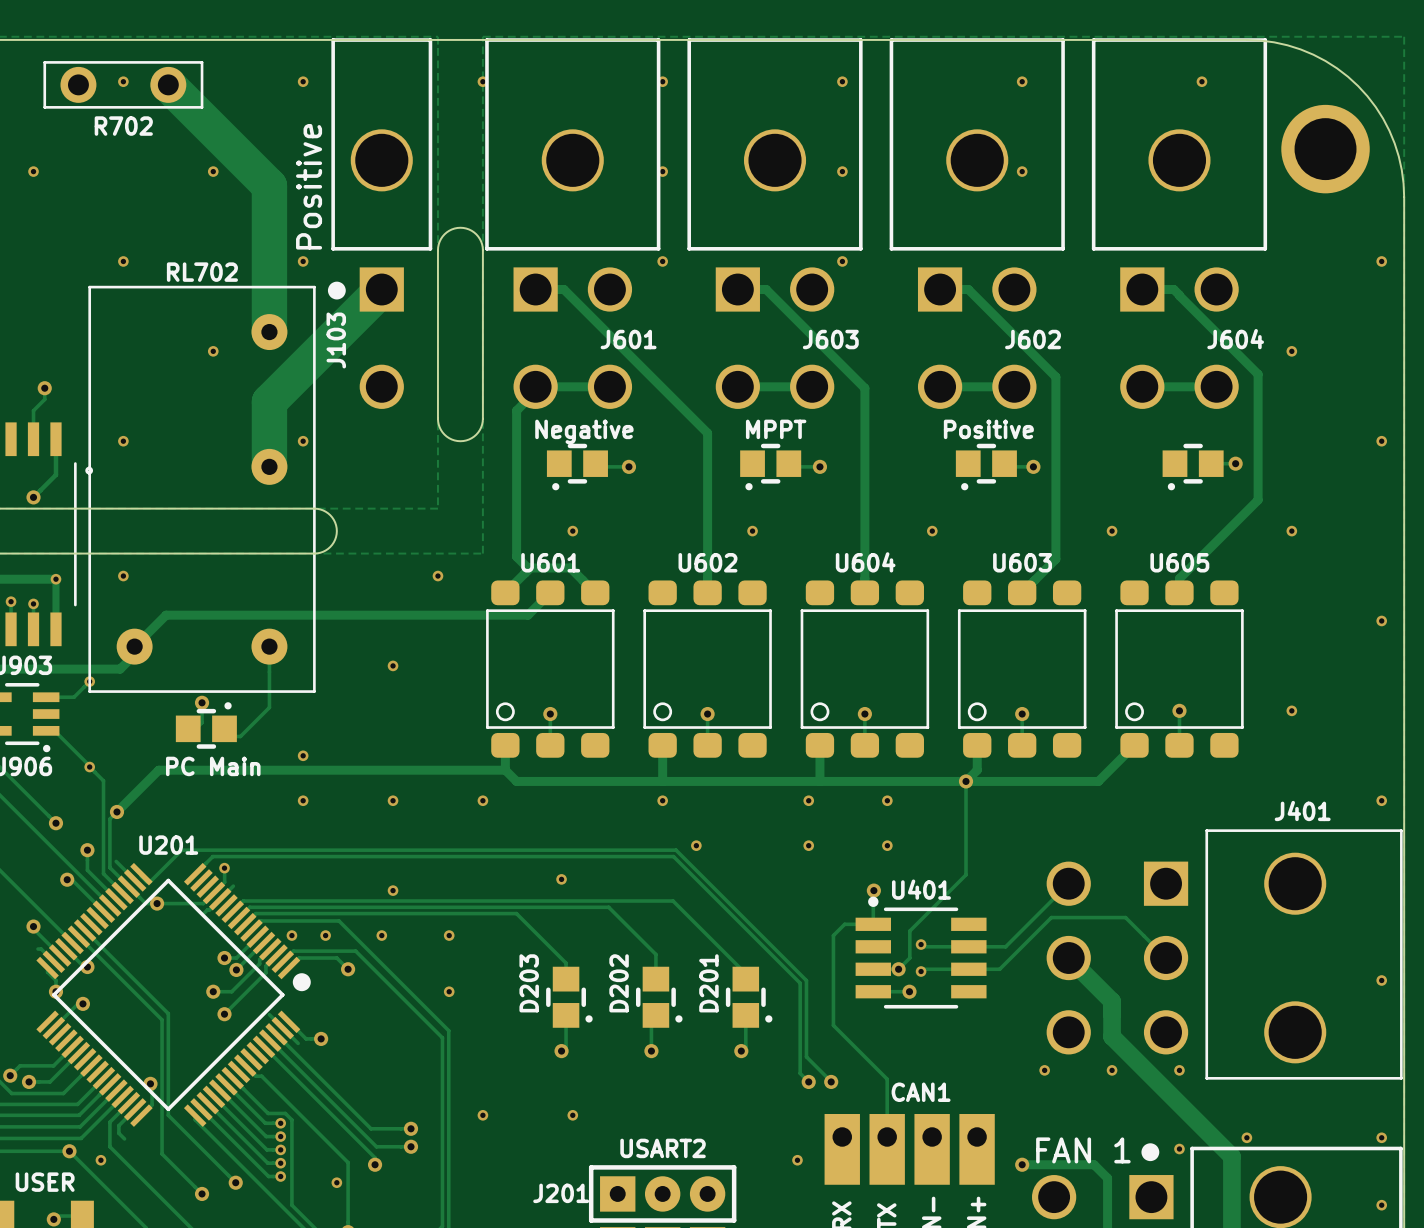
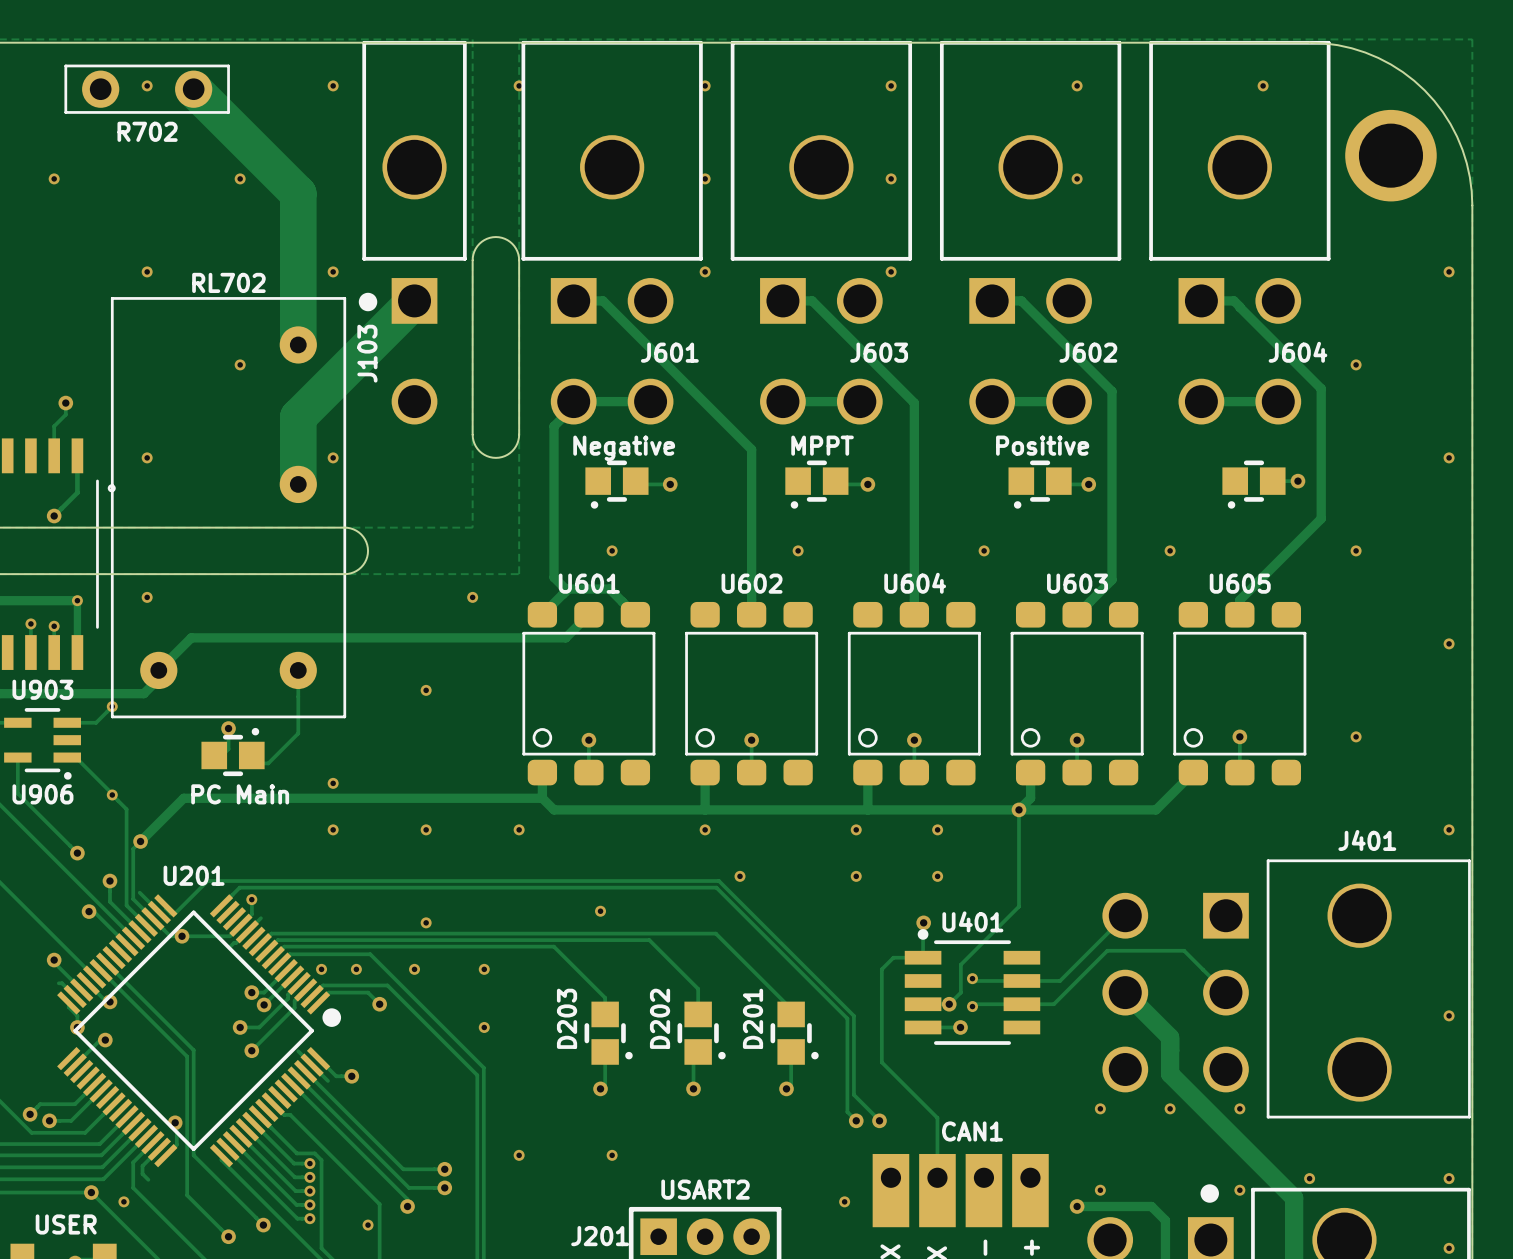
text: Positive (309, 186) -> none
via: none -> (1100, 1190)
text: FAN 1 (1083, 1150) -> none

